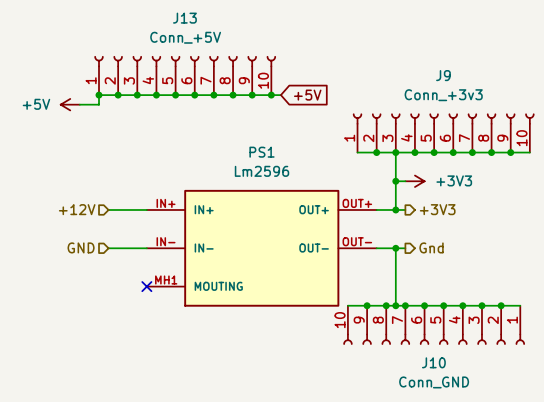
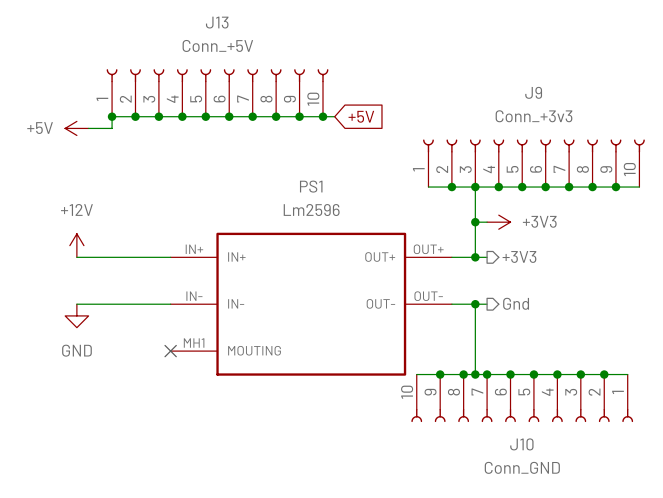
power symbol: none -> +12V (76, 245)
wire: none -> (76, 257) (123, 257)
hierarchical label: +12V (77, 209) -> none
hierarchical label: GND (81, 247) -> none
wire: none -> (76, 304) (123, 304)
power symbol: none -> GND (76, 315)

